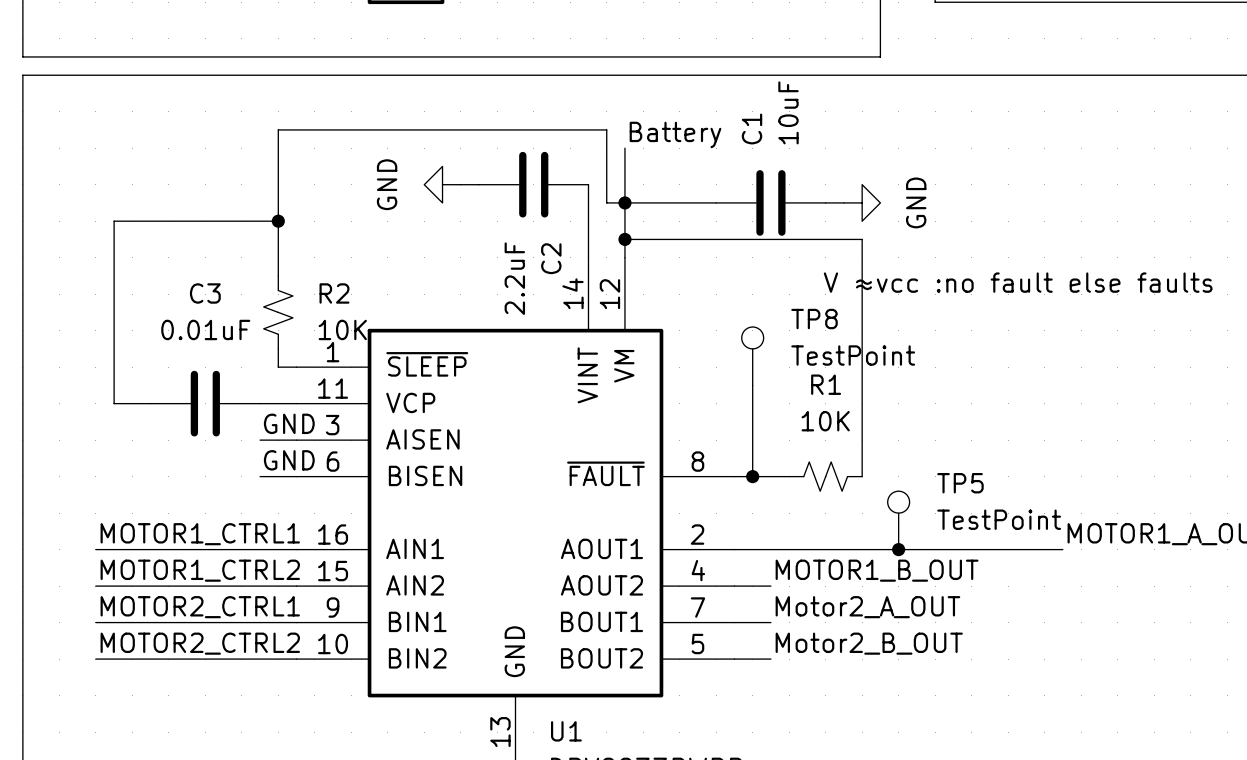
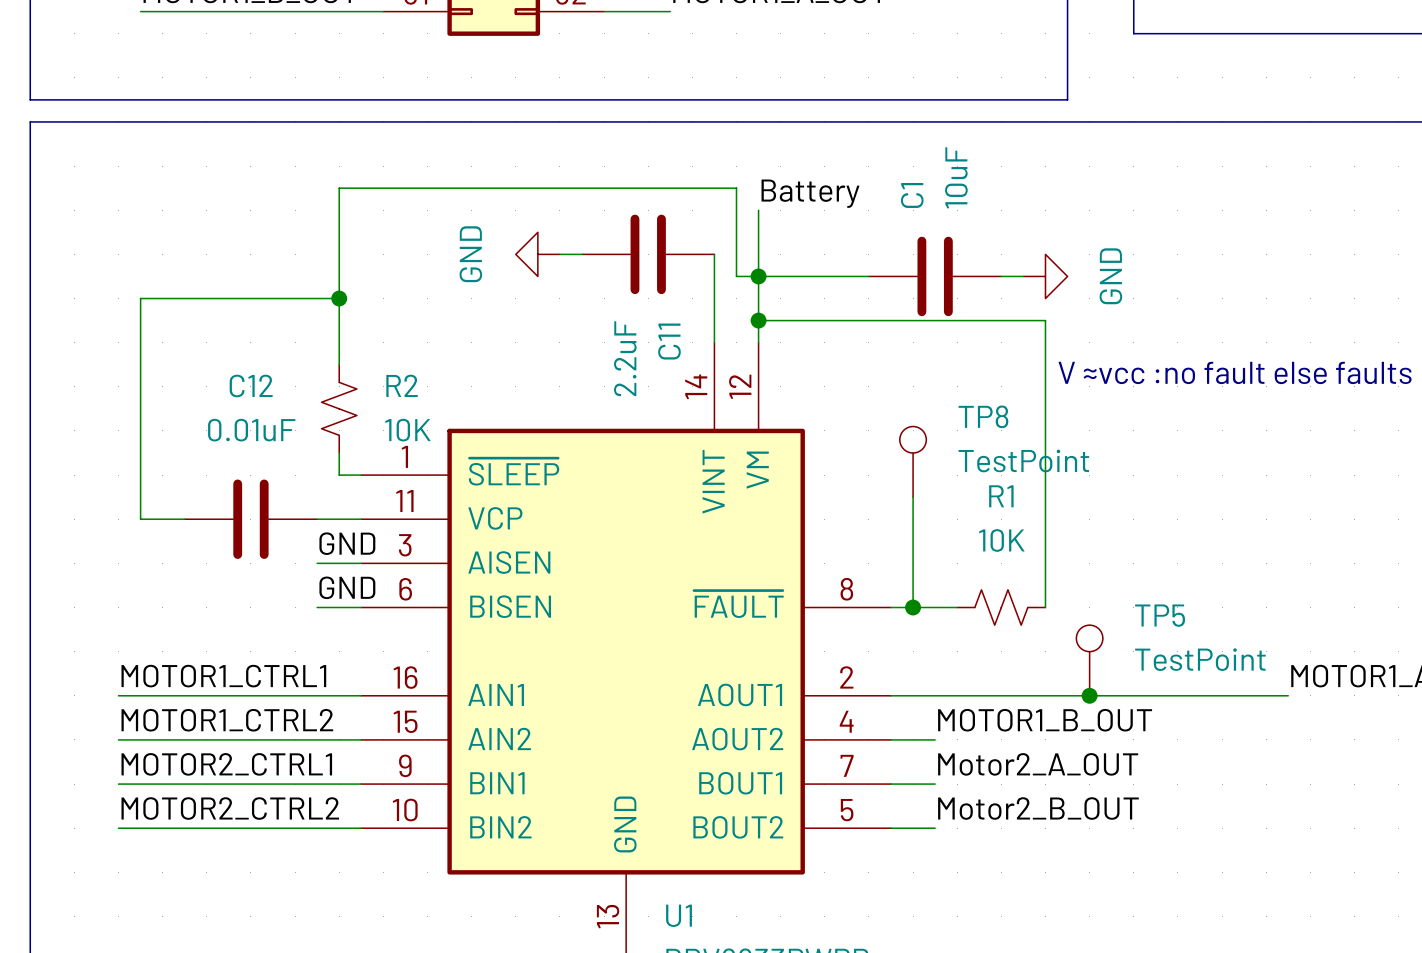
C2 name: C2 (551, 258) -> C11 (669, 341)
C3 name: C3 (205, 293) -> C12 (251, 385)

